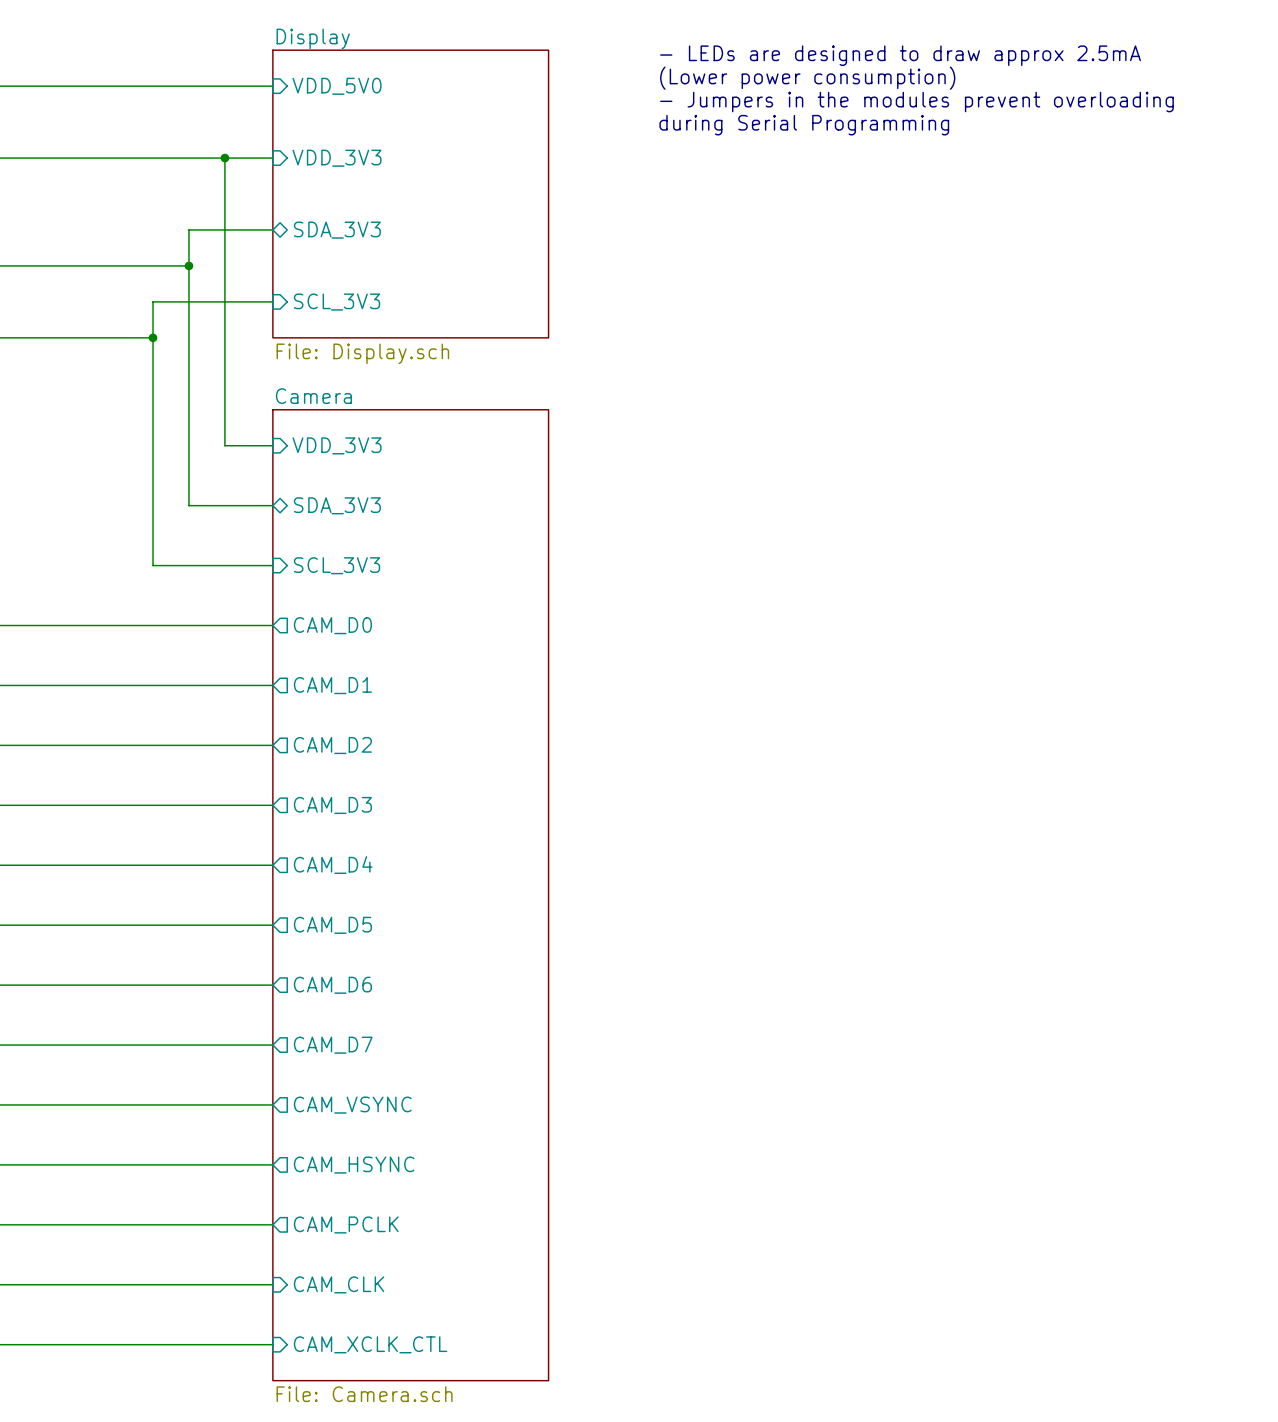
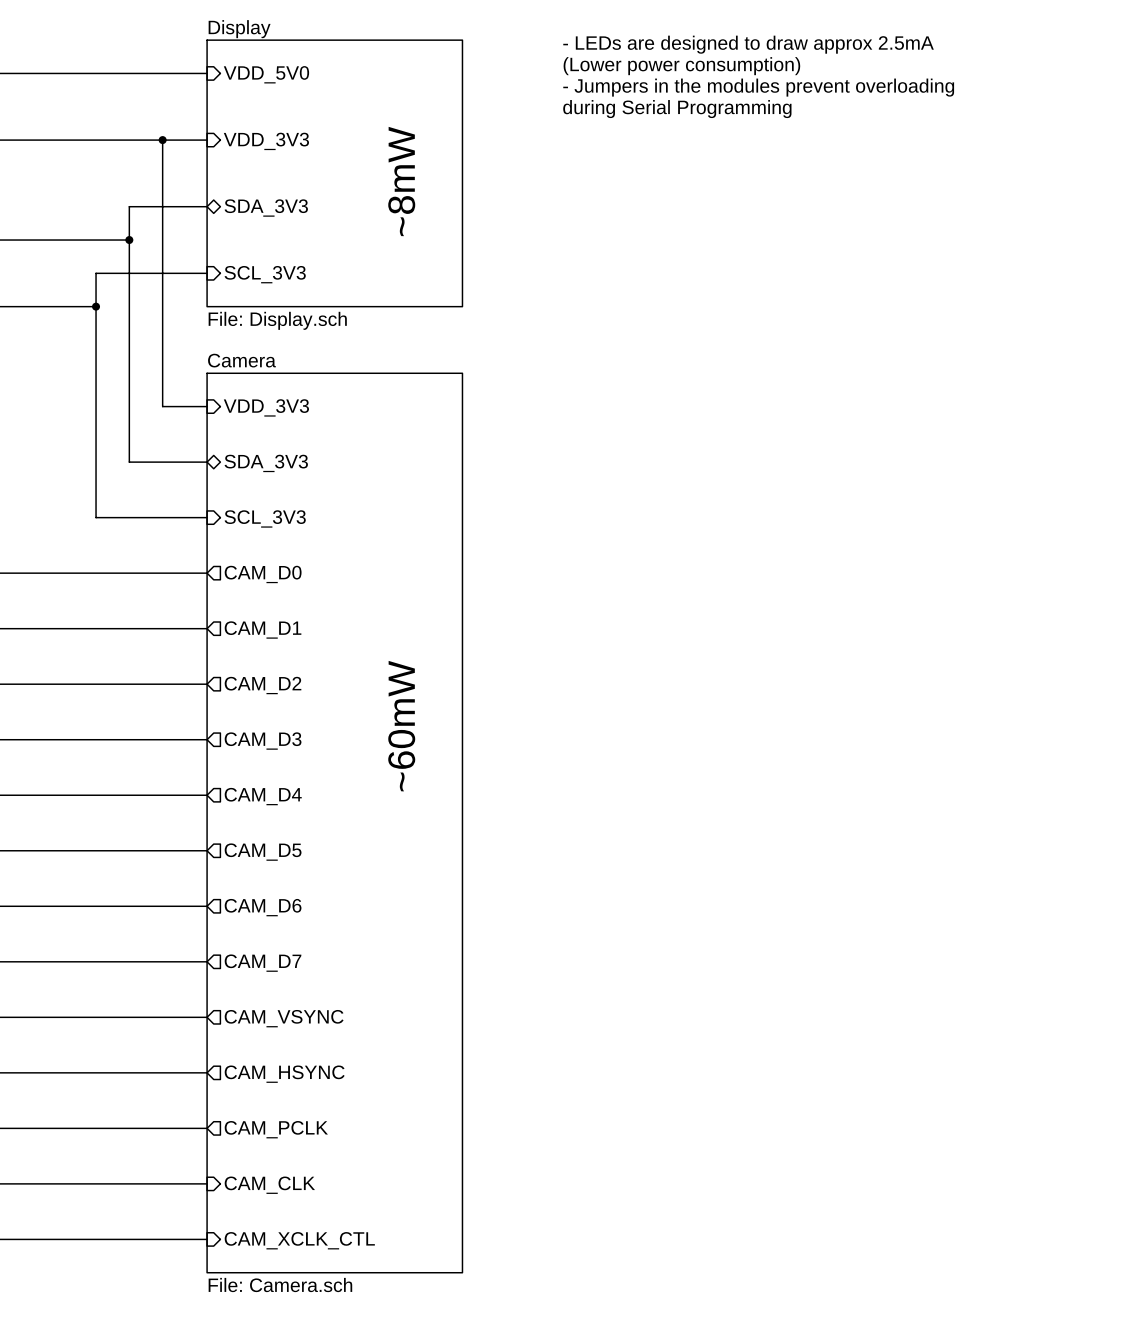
text: none -> ~8mW (401, 181)
text: none -> ~60mW (401, 726)

